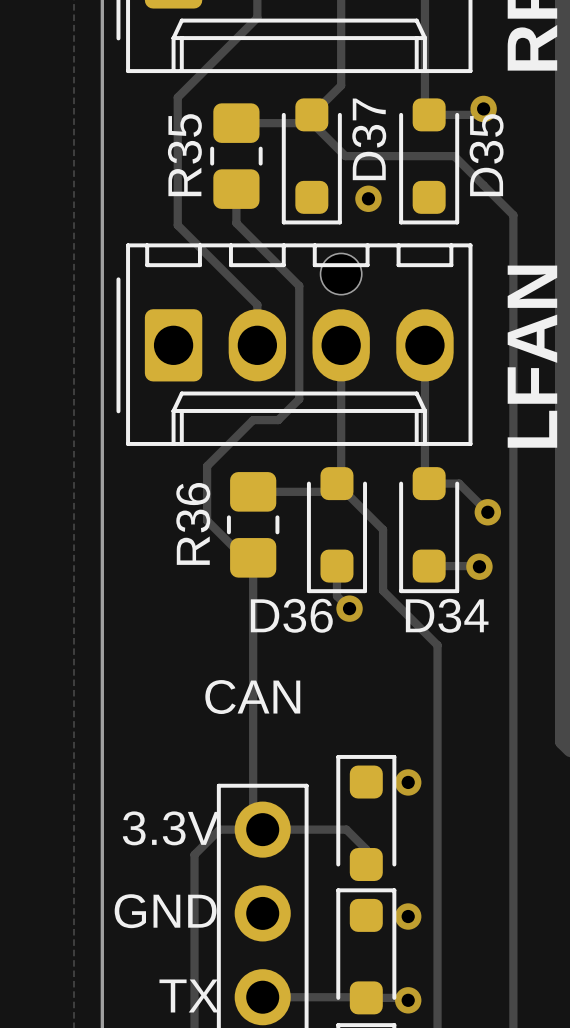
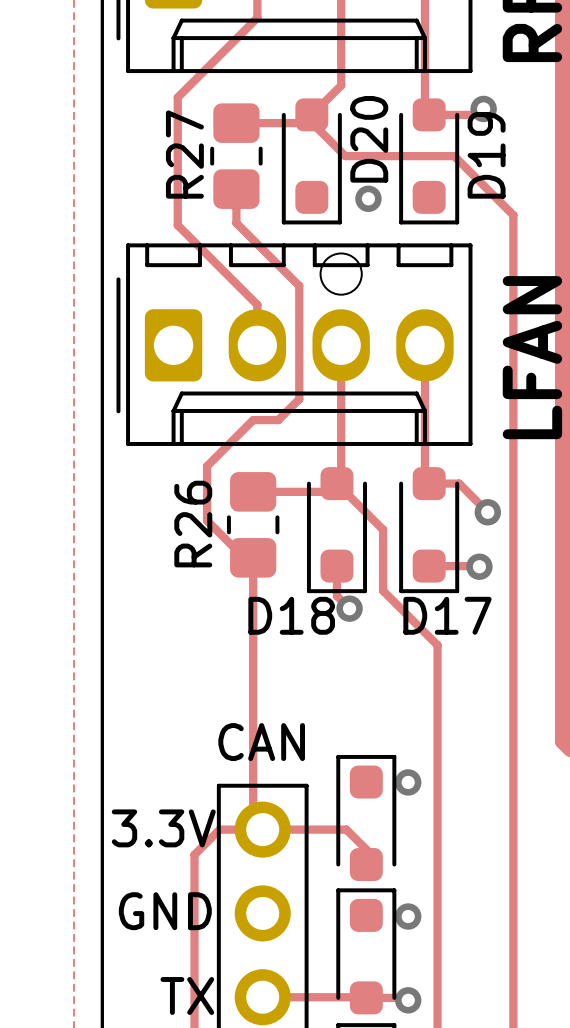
D37 name: D37 (369, 139) -> D20 (369, 139)
R35 name: R35 (184, 155) -> R27 (184, 154)
D35 name: D35 (486, 155) -> D19 (486, 155)
R36 name: R36 (193, 523) -> R26 (193, 524)
D36 name: D36 (291, 615) -> D18 (291, 615)
D34 name: D34 (447, 615) -> D17 (447, 615)
text position: CAN (252, 697) -> CAN (261, 742)

